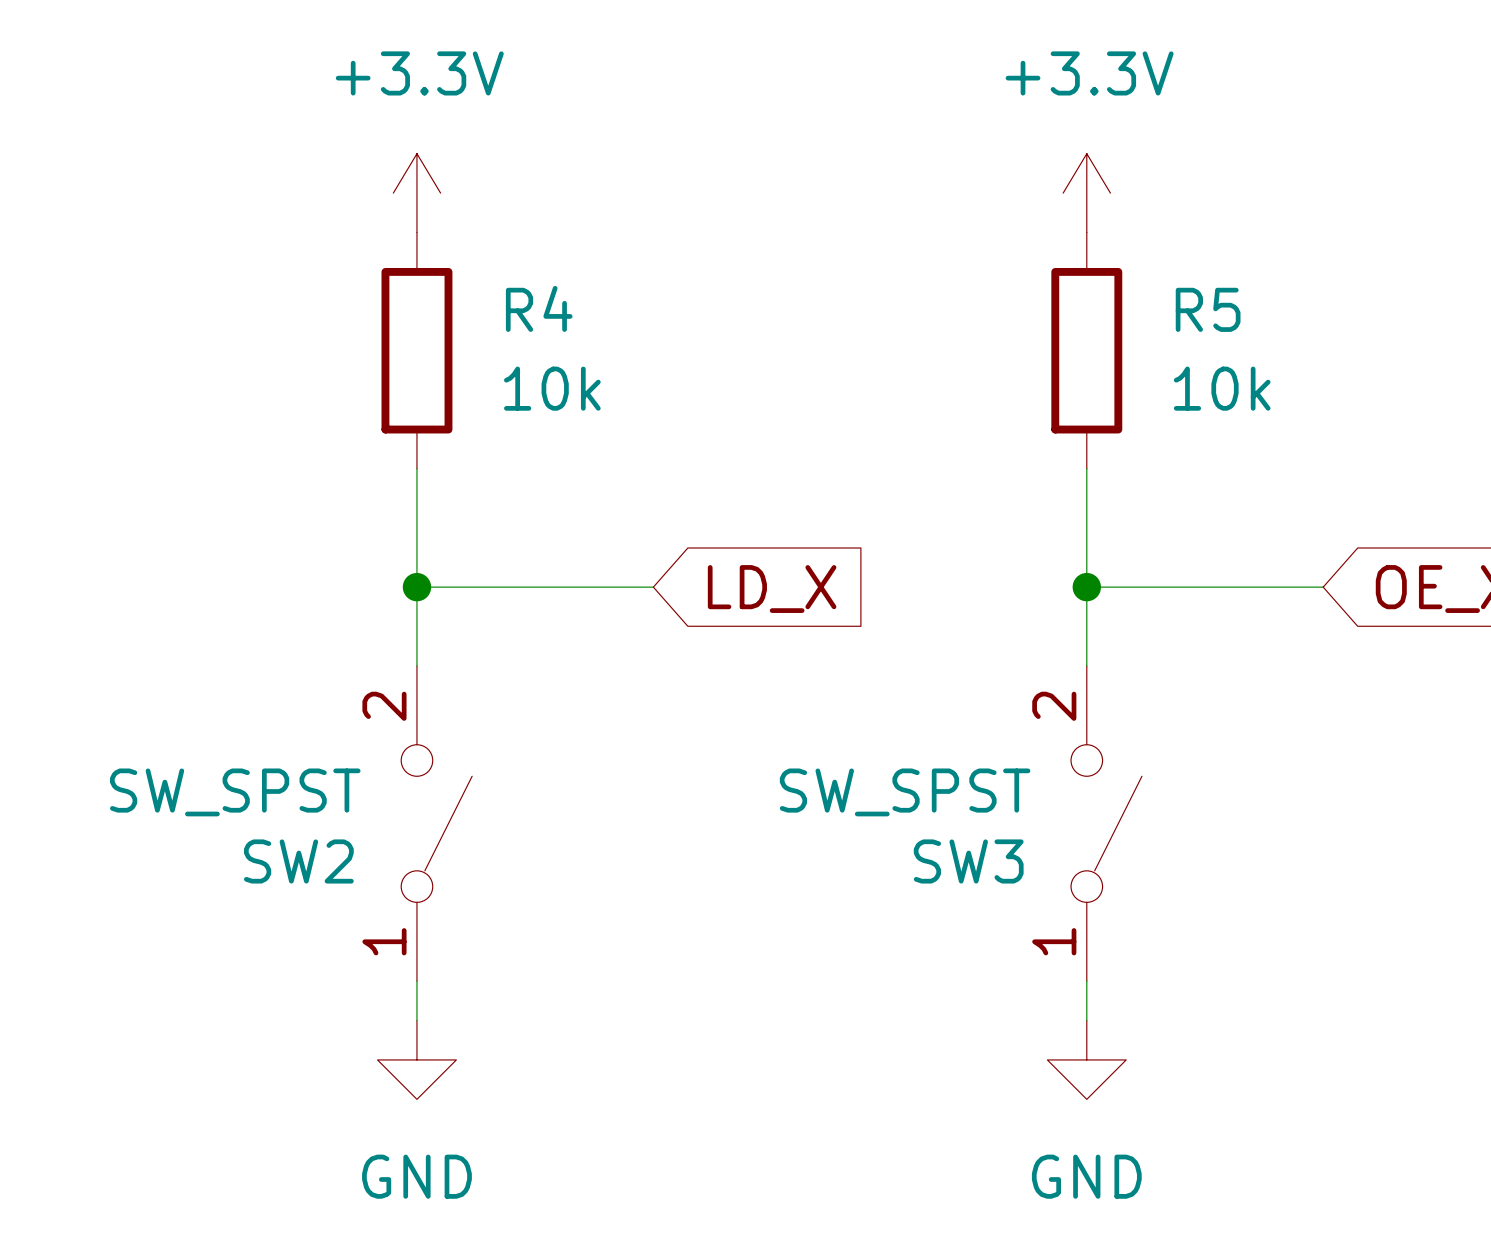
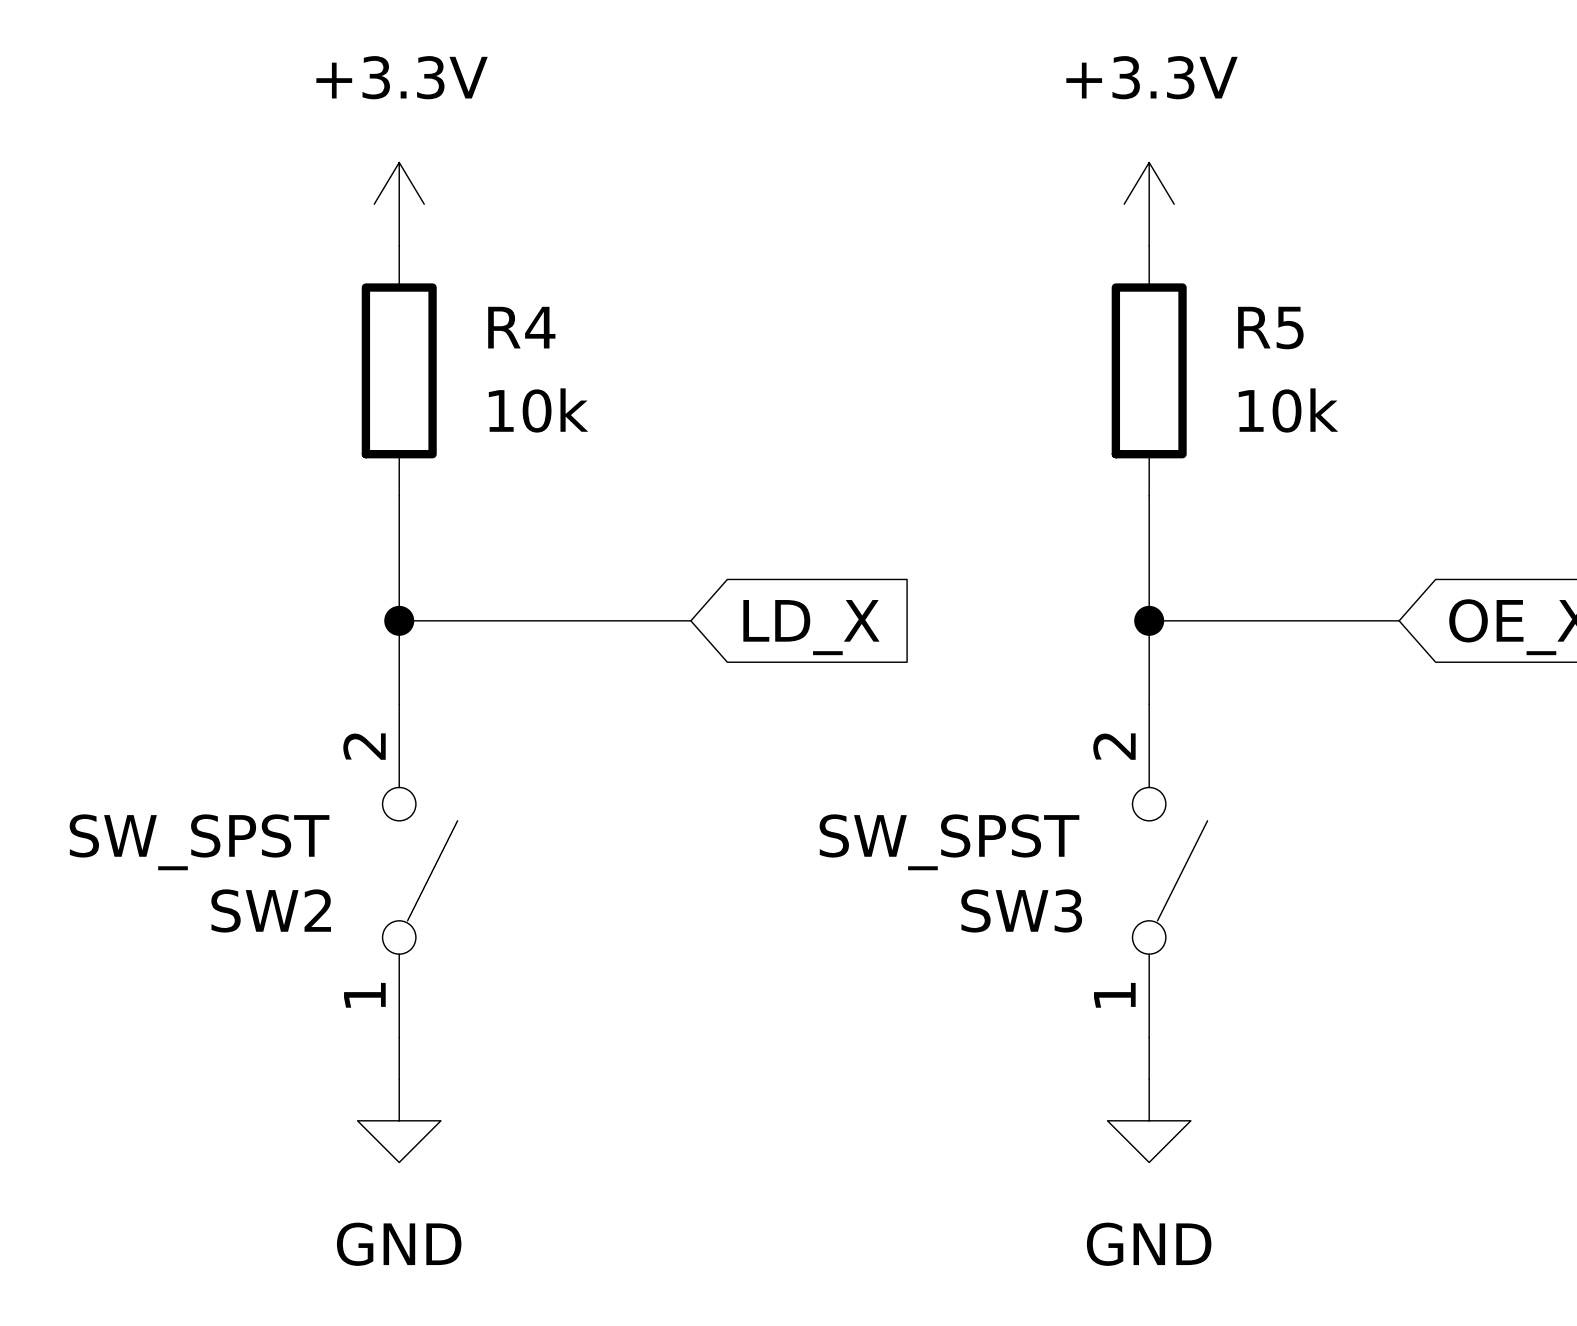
power symbol position: +3.3V (416, 193) -> +3.3V (399, 204)
R4 position: (416, 350) -> (399, 370)
wire: (416, 468) (416, 665) -> (399, 495) (399, 704)
wire: none -> (399, 620) (440, 620)
junction position: (416, 587) -> (399, 620)
SW2 position: (436, 823) -> (420, 870)
wire: (416, 981) (416, 1020) -> (399, 1037) (399, 1079)
power symbol position: GND (416, 1059) -> GND (399, 1120)

